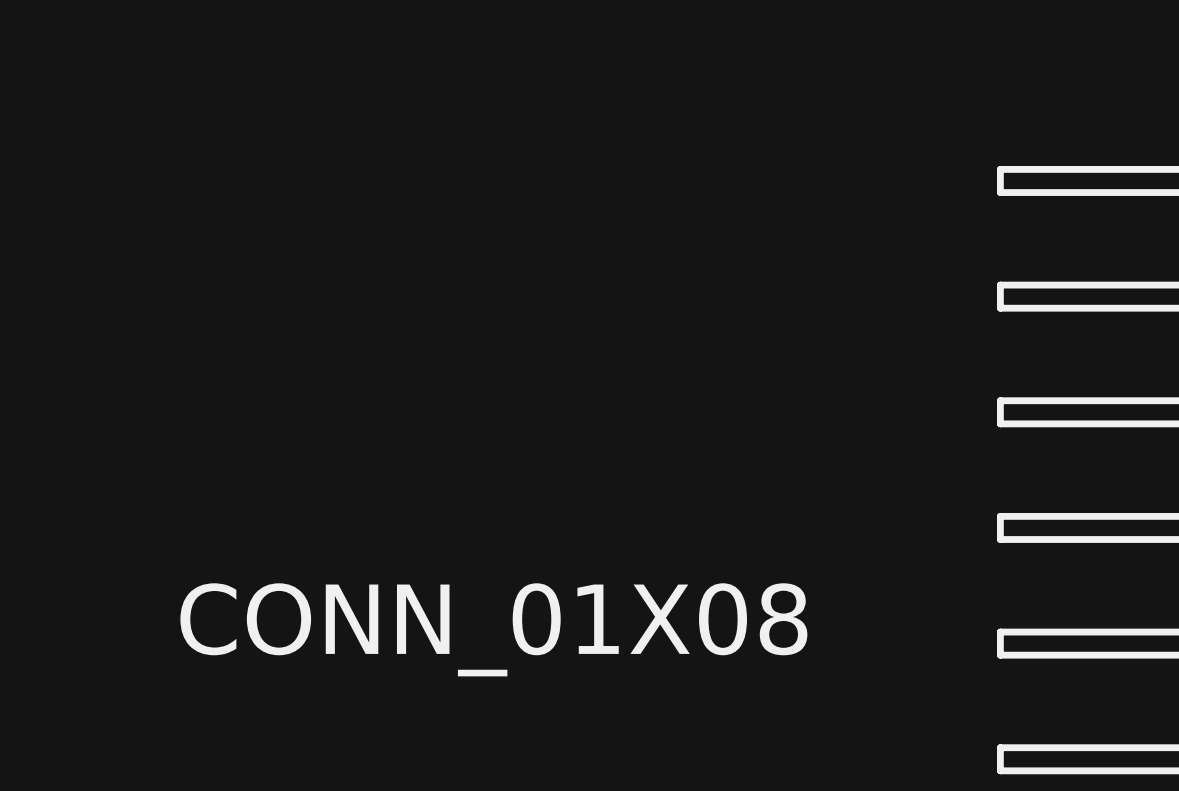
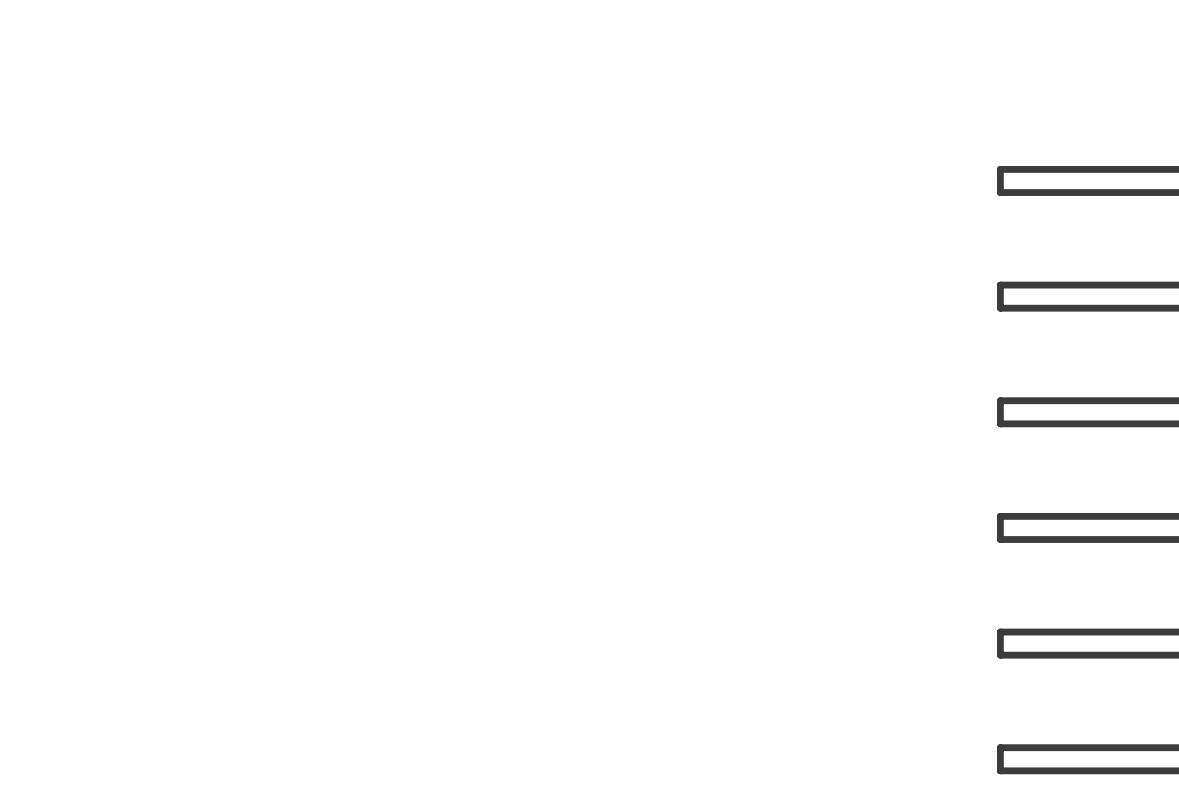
part value: CONN_01X08 (493, 629) -> none

